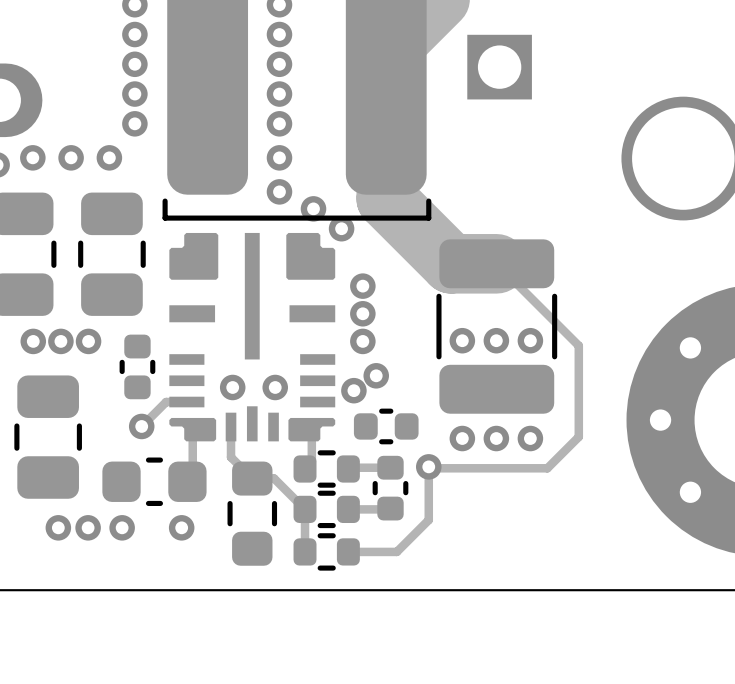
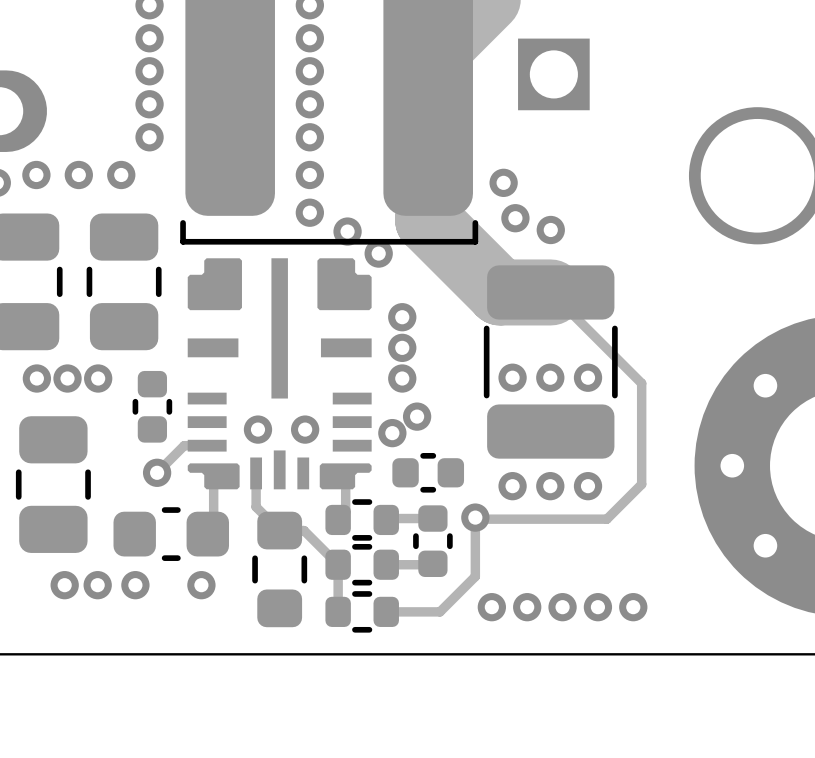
via: none -> (503, 182)
via: none -> (515, 218)
via: none -> (550, 229)
via: none -> (491, 607)
via: none -> (527, 607)
via: none -> (562, 607)
via: none -> (597, 607)
via: none -> (633, 607)

